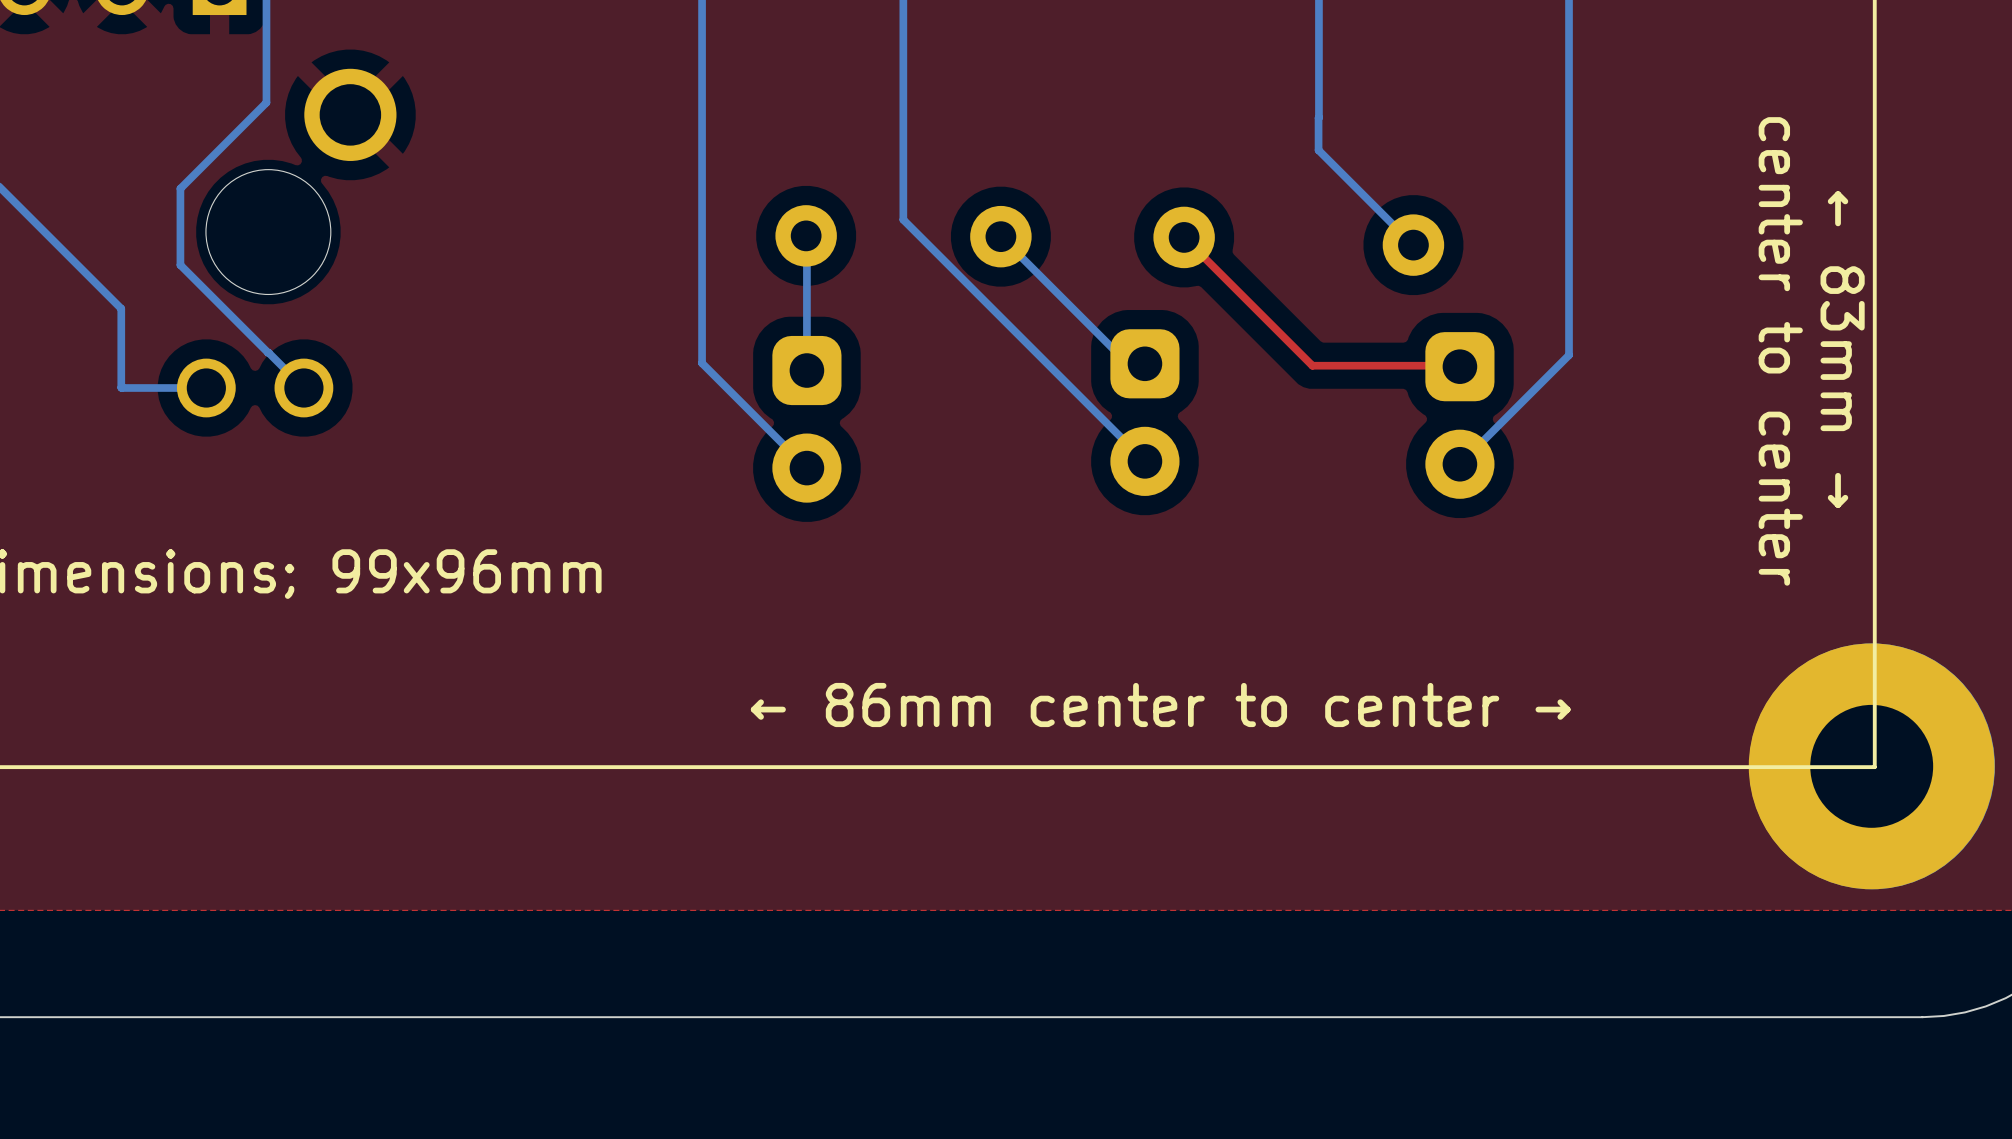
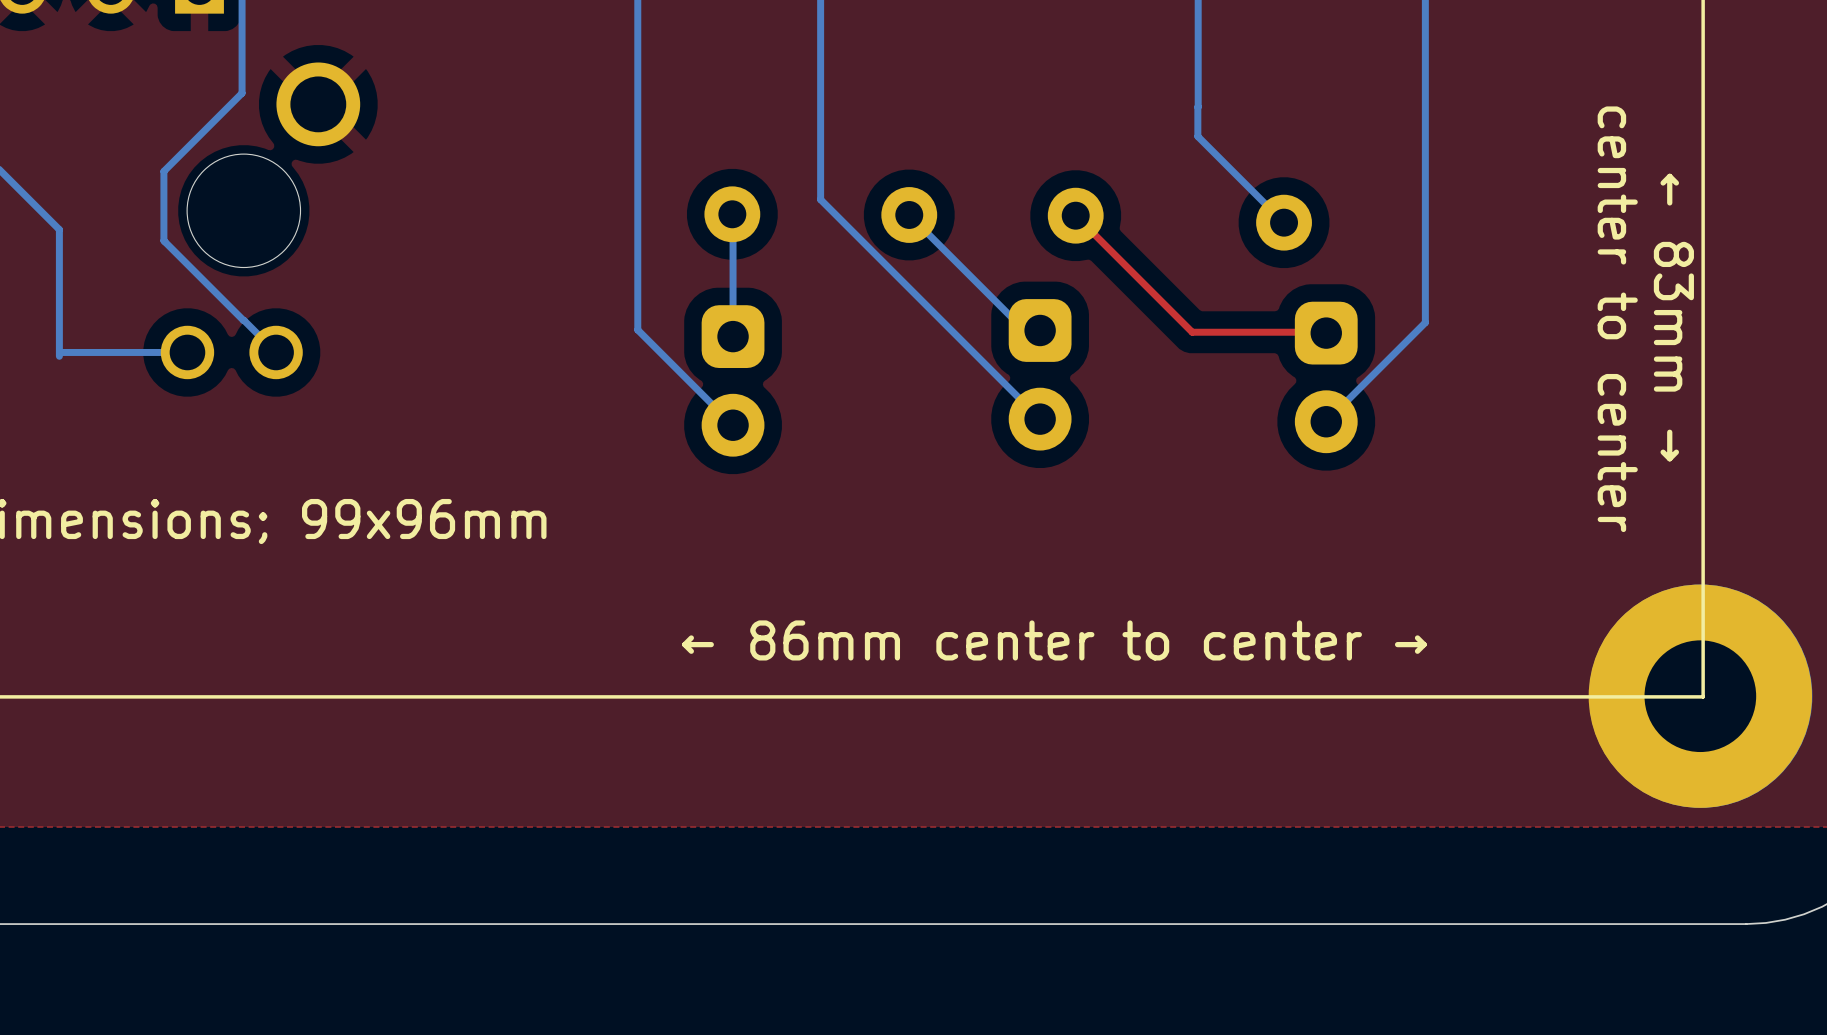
bottom track: (65, 252) (121, 308) (121, 387) -> (59, 229) (59, 356)
bottom track: none -> (110, 352) (63, 352)

